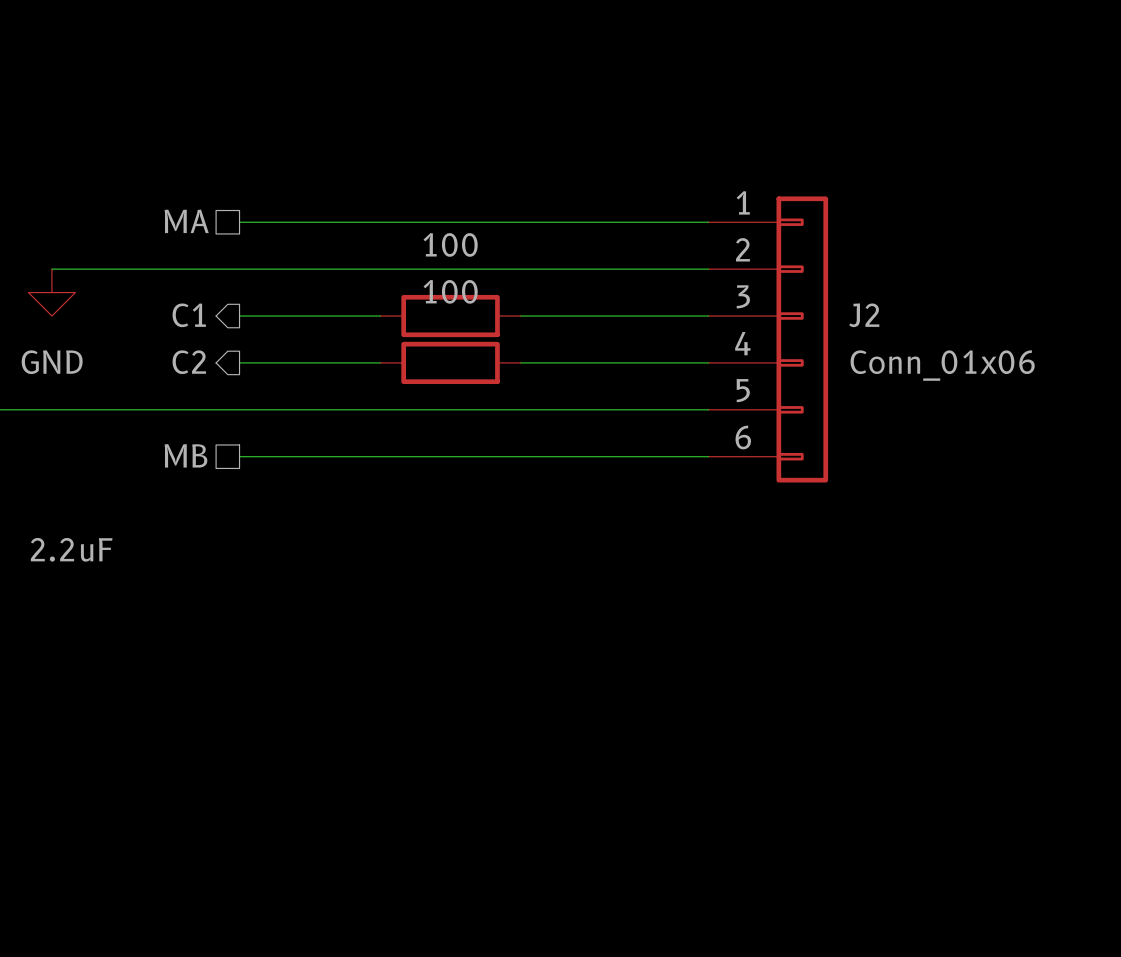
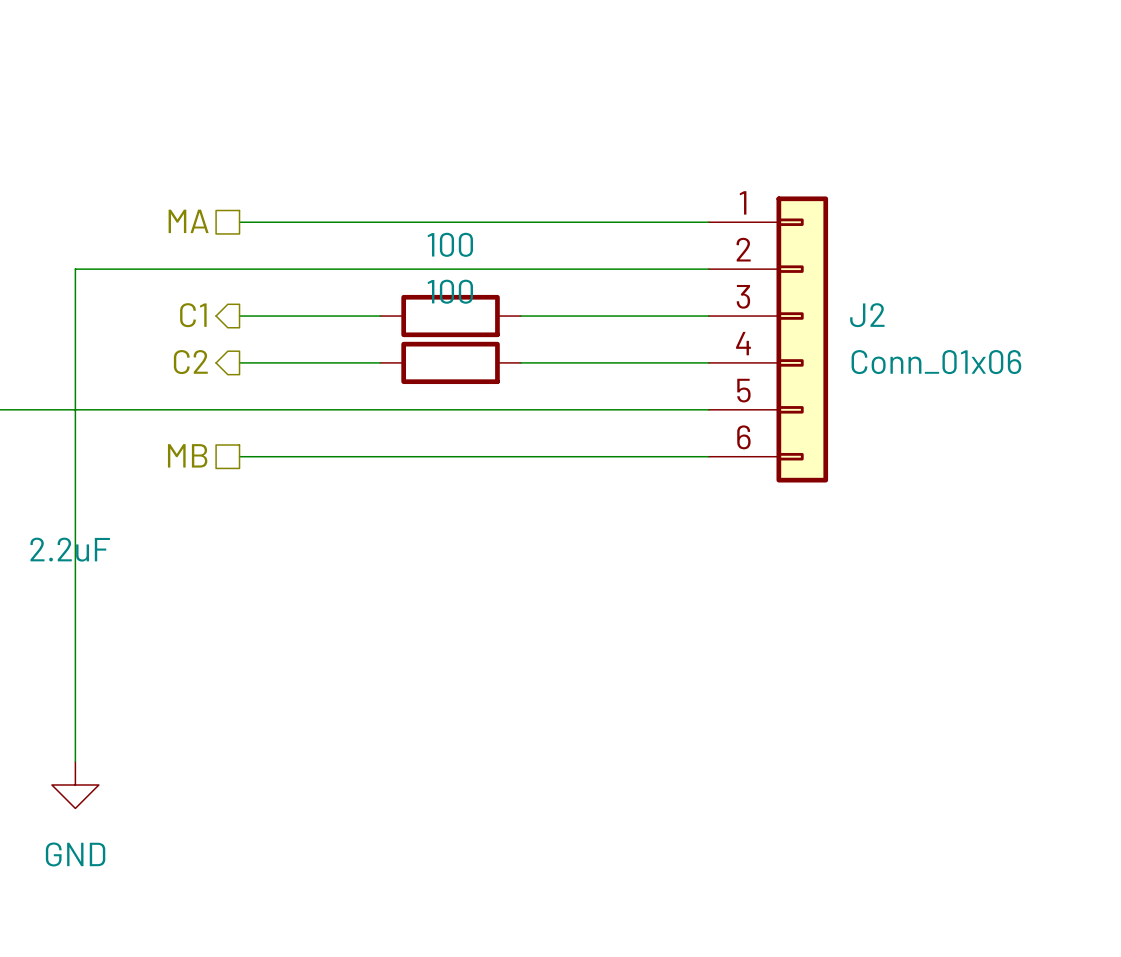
wire: (51, 269) (75, 269) -> (75, 761) (75, 269)
power symbol: GND (51, 292) -> none
power symbol: none -> GND (75, 785)

